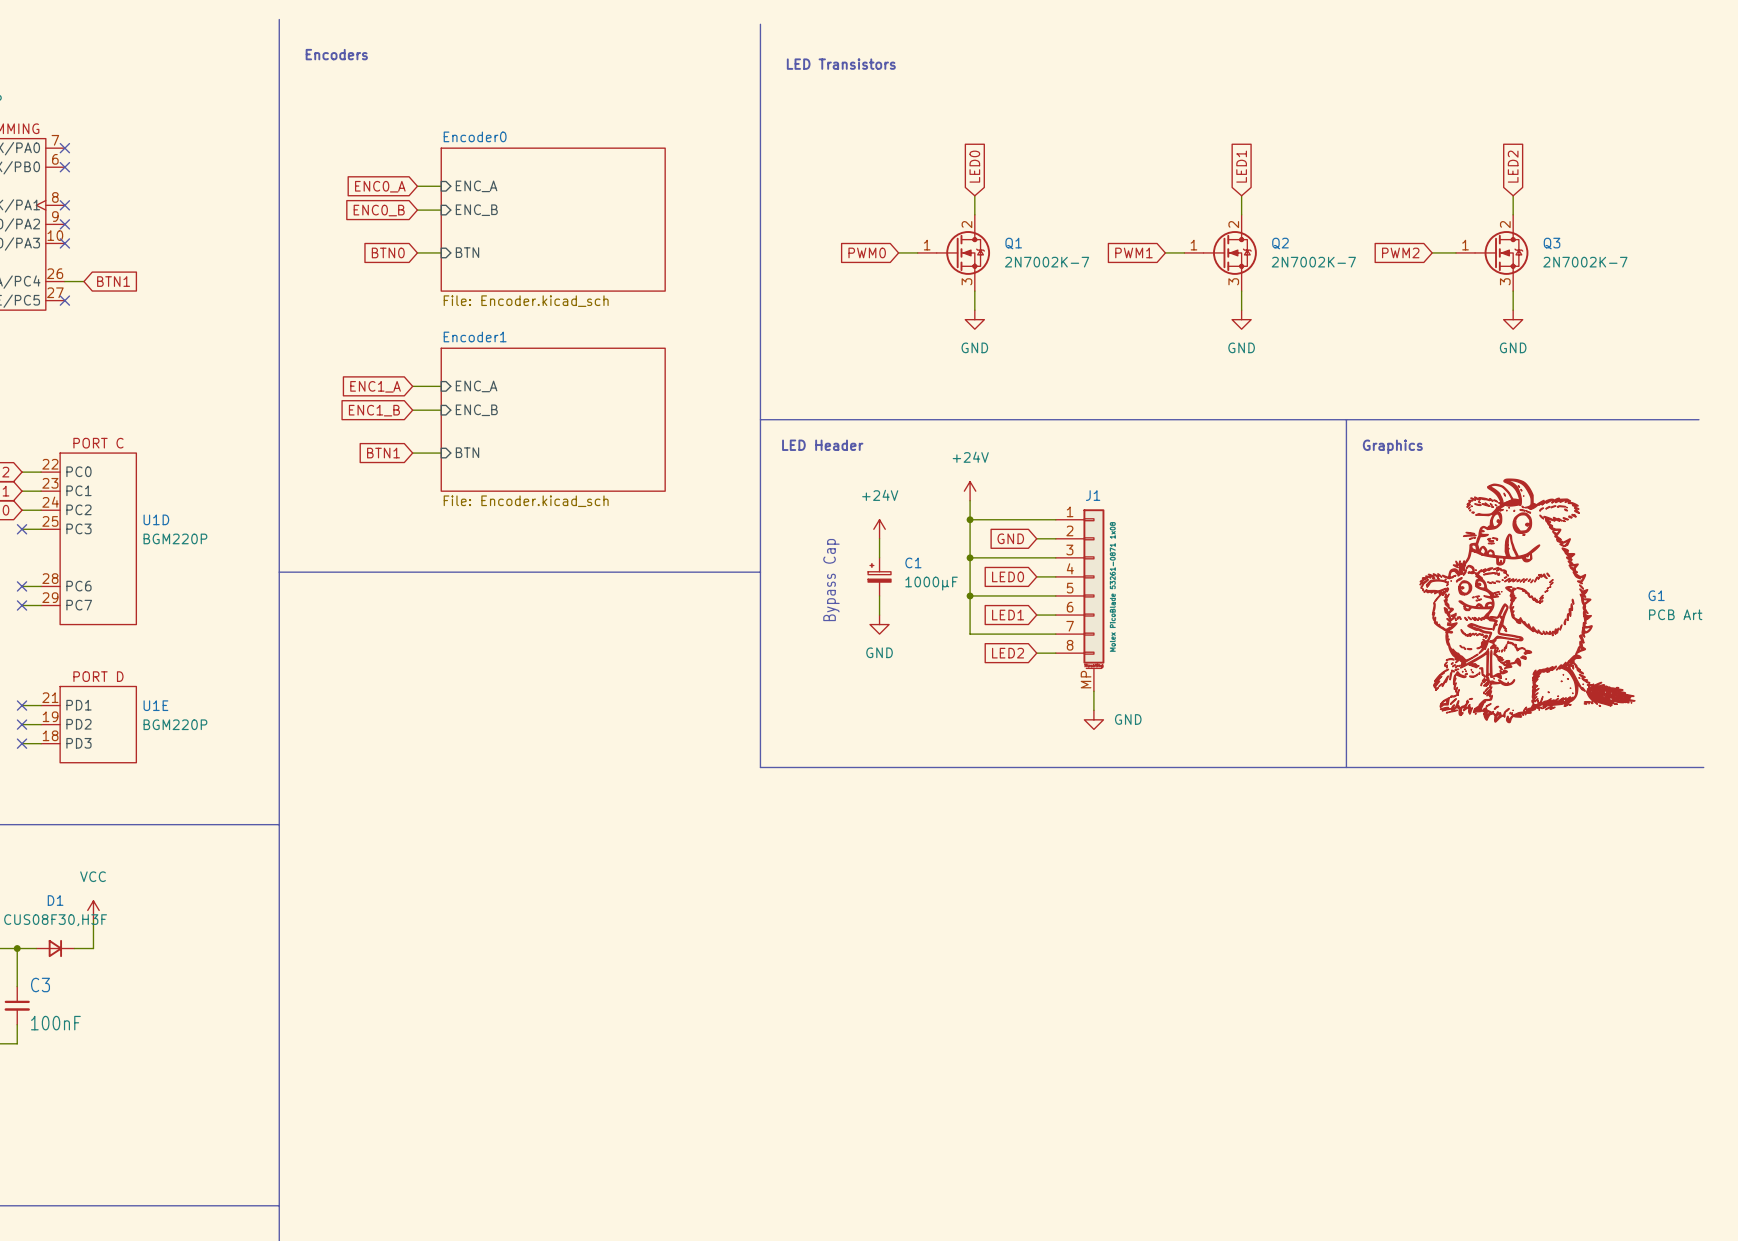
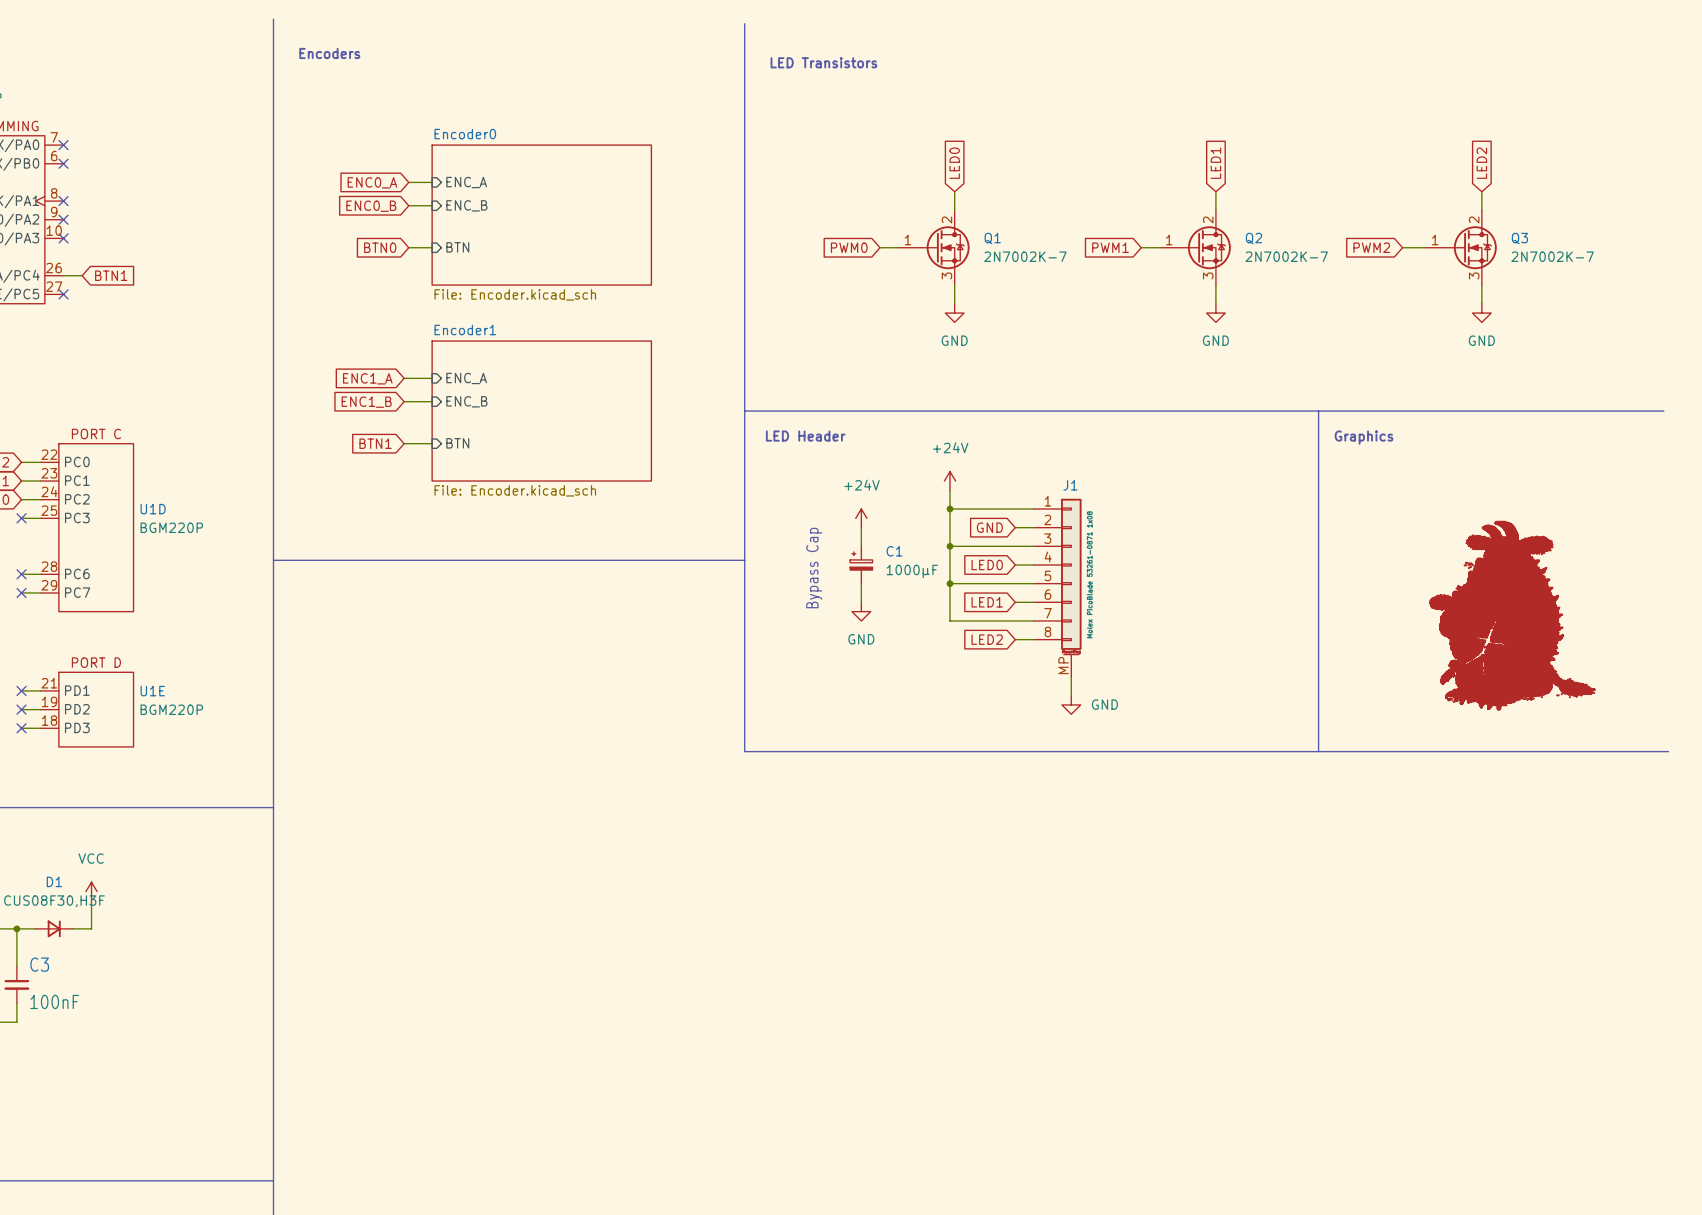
G1: PCB Art (1527, 600) -> none
part: none -> (1512, 615)

